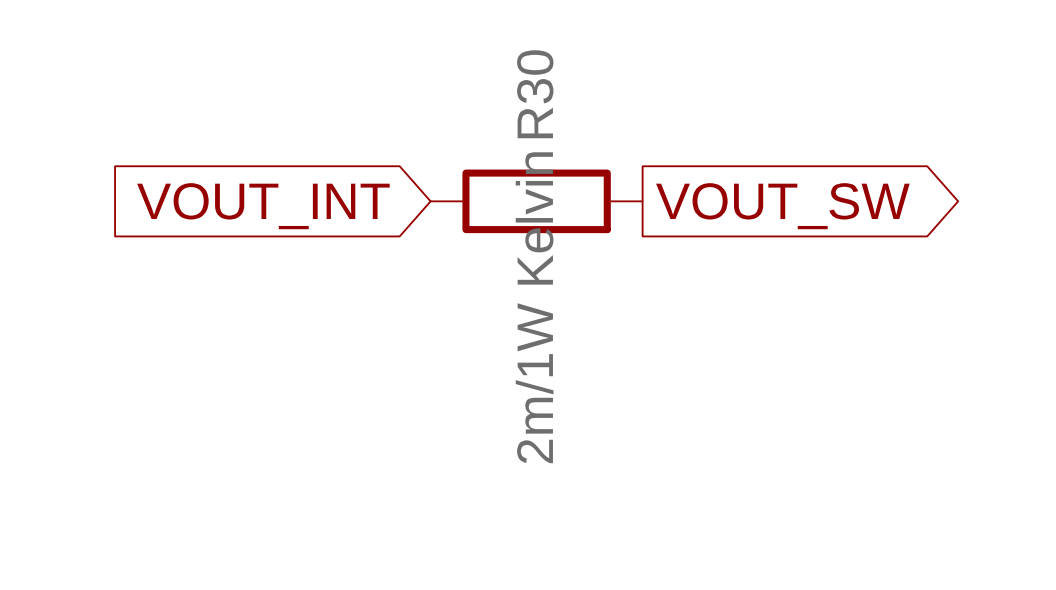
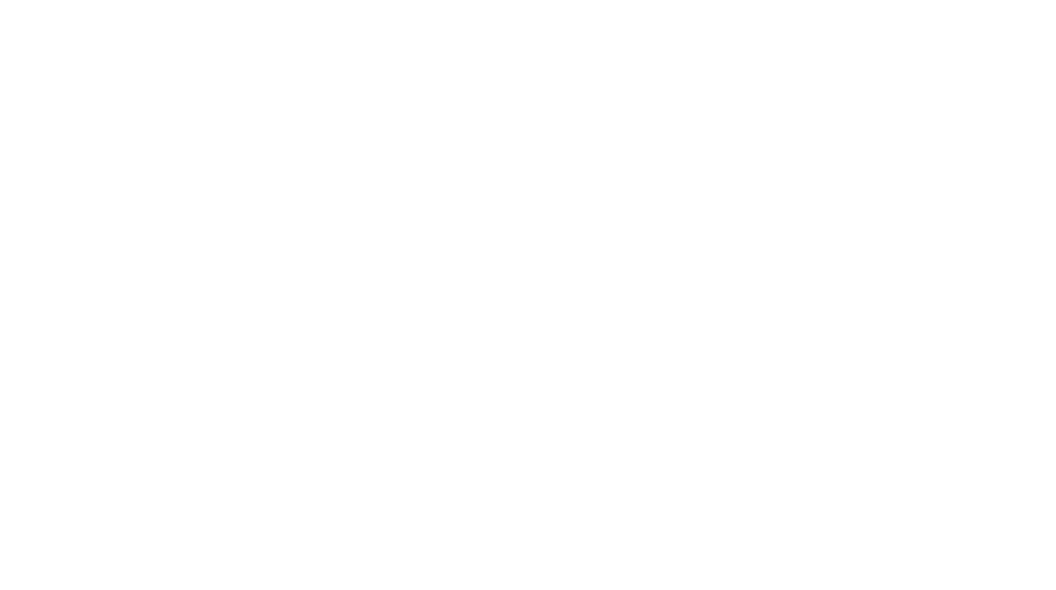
R30: 2m/1W Kelvin (536, 201) -> none
global label: VOUT_INT (263, 206) -> none
global label: VOUT_SW (782, 206) -> none

